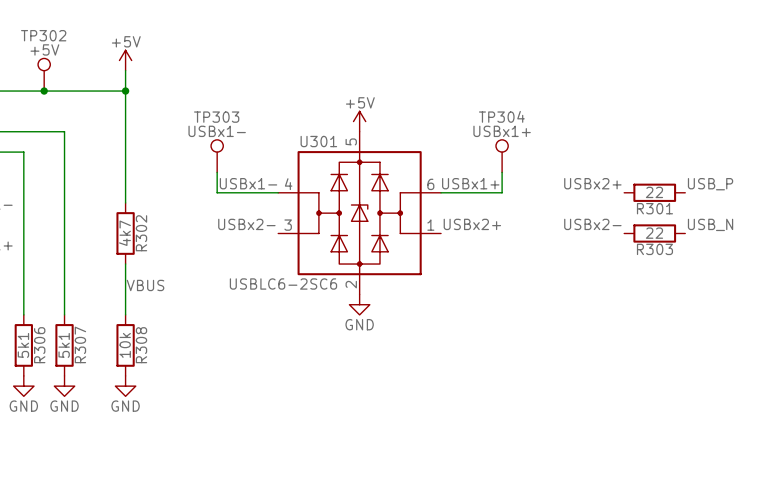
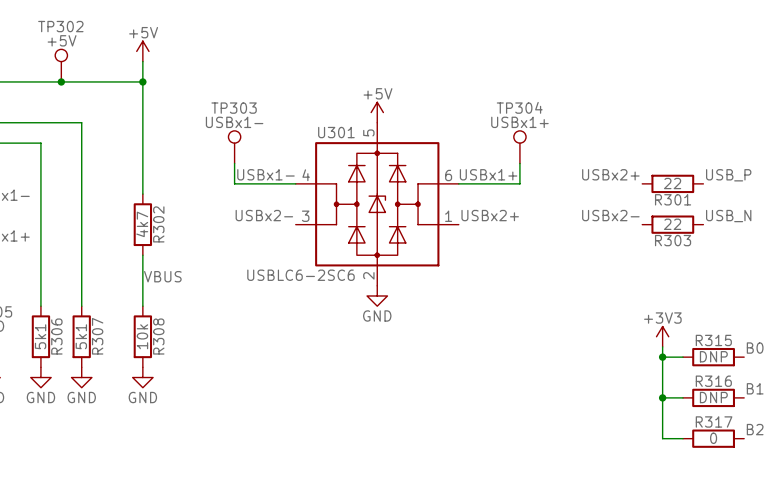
power symbol: none -> +3V3 (662, 336)
wire: none -> (662, 346) (662, 438) (683, 438)
label: none -> B0 (755, 348)
wire: none -> (662, 357) (683, 357)
junction: none -> (662, 357)
R315: none -> DNP (713, 357)
label: none -> B1 (755, 388)
wire: none -> (662, 397) (683, 397)
junction: none -> (662, 397)
R316: none -> DNP (713, 397)
label: none -> B2 (755, 429)
R317: none -> 0 (713, 438)

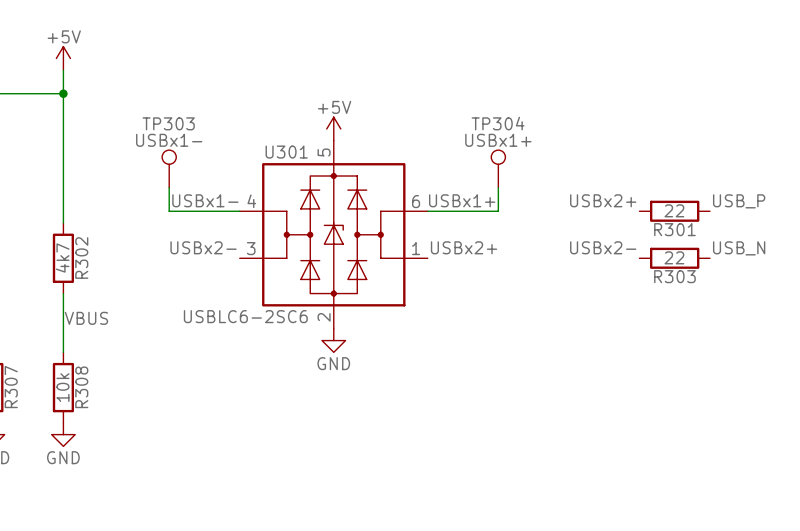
power symbol: +3V3 (662, 336) -> none
wire: (662, 346) (662, 438) (683, 438) -> none
label: B0 (755, 348) -> none
wire: (662, 357) (683, 357) -> none
junction: (662, 357) -> none
R315: DNP (713, 357) -> none
label: B1 (755, 388) -> none
wire: (662, 397) (683, 397) -> none
junction: (662, 397) -> none
R316: DNP (713, 397) -> none
label: B2 (755, 429) -> none
R317: 0 (713, 438) -> none

